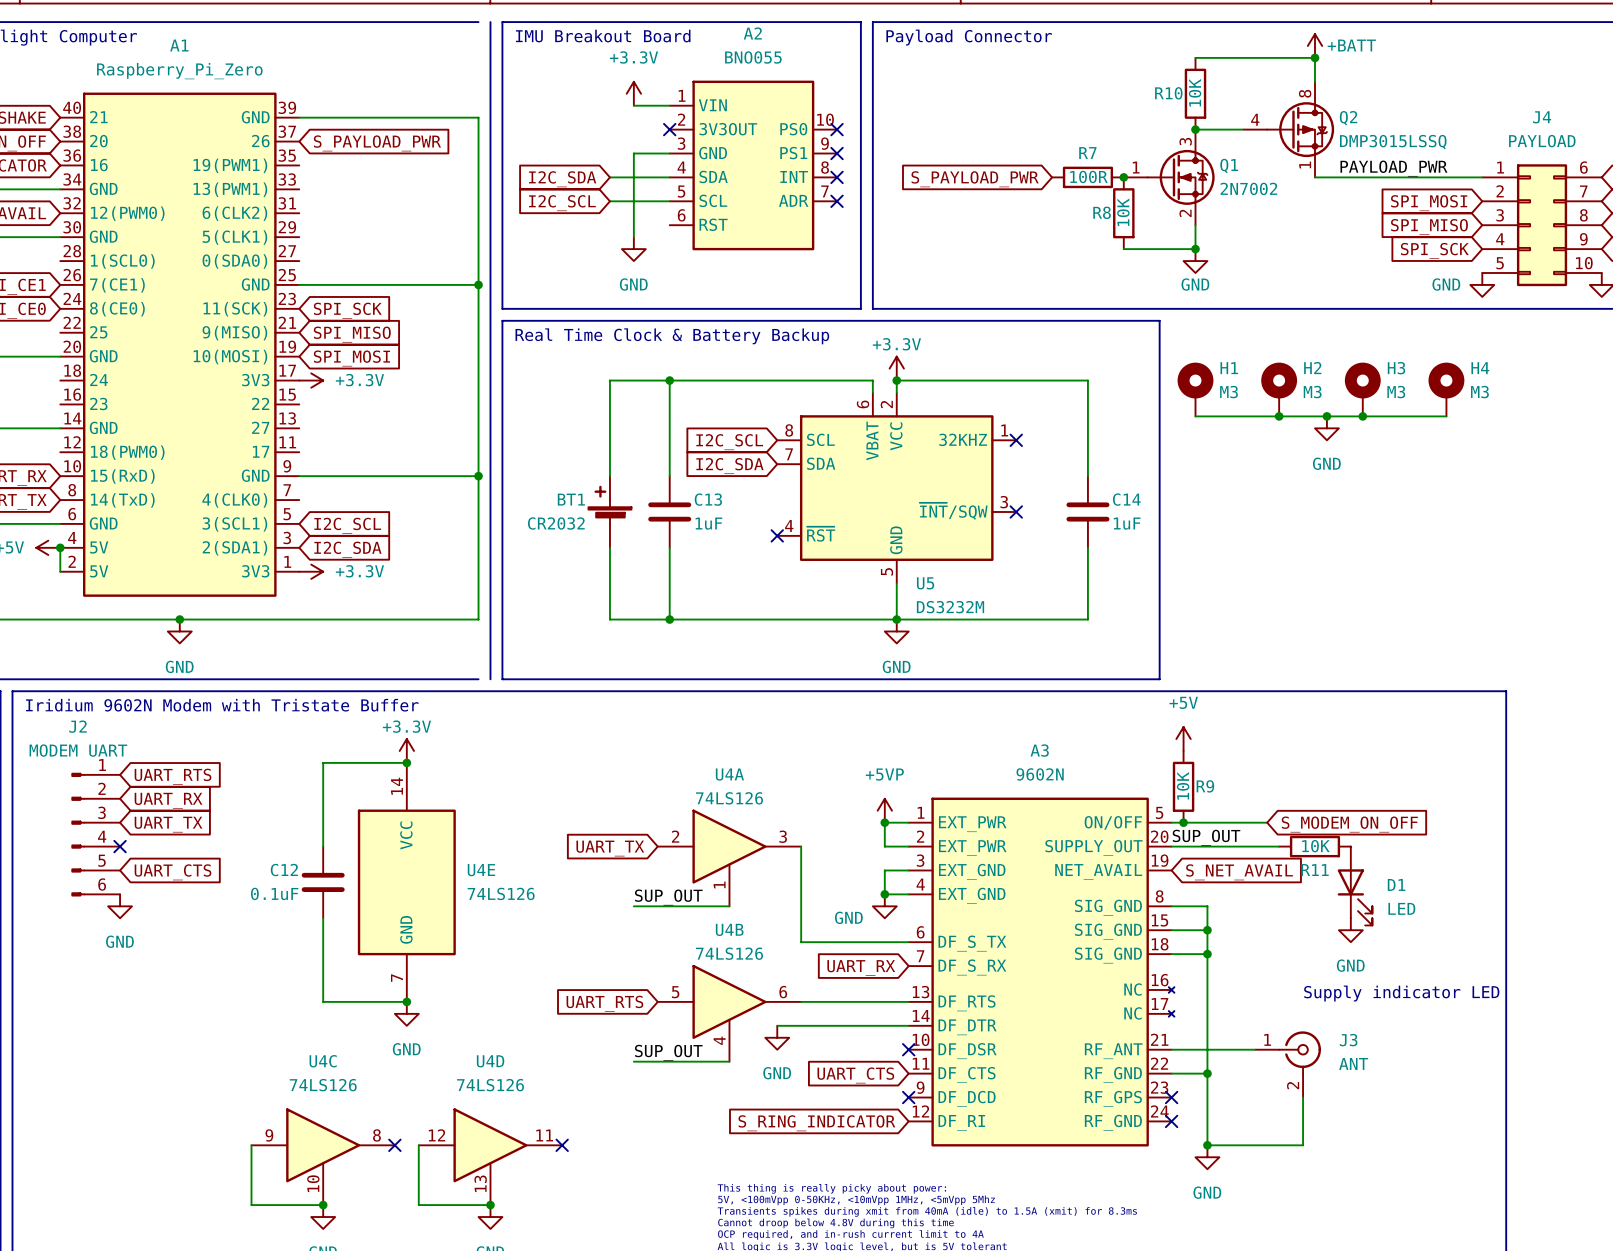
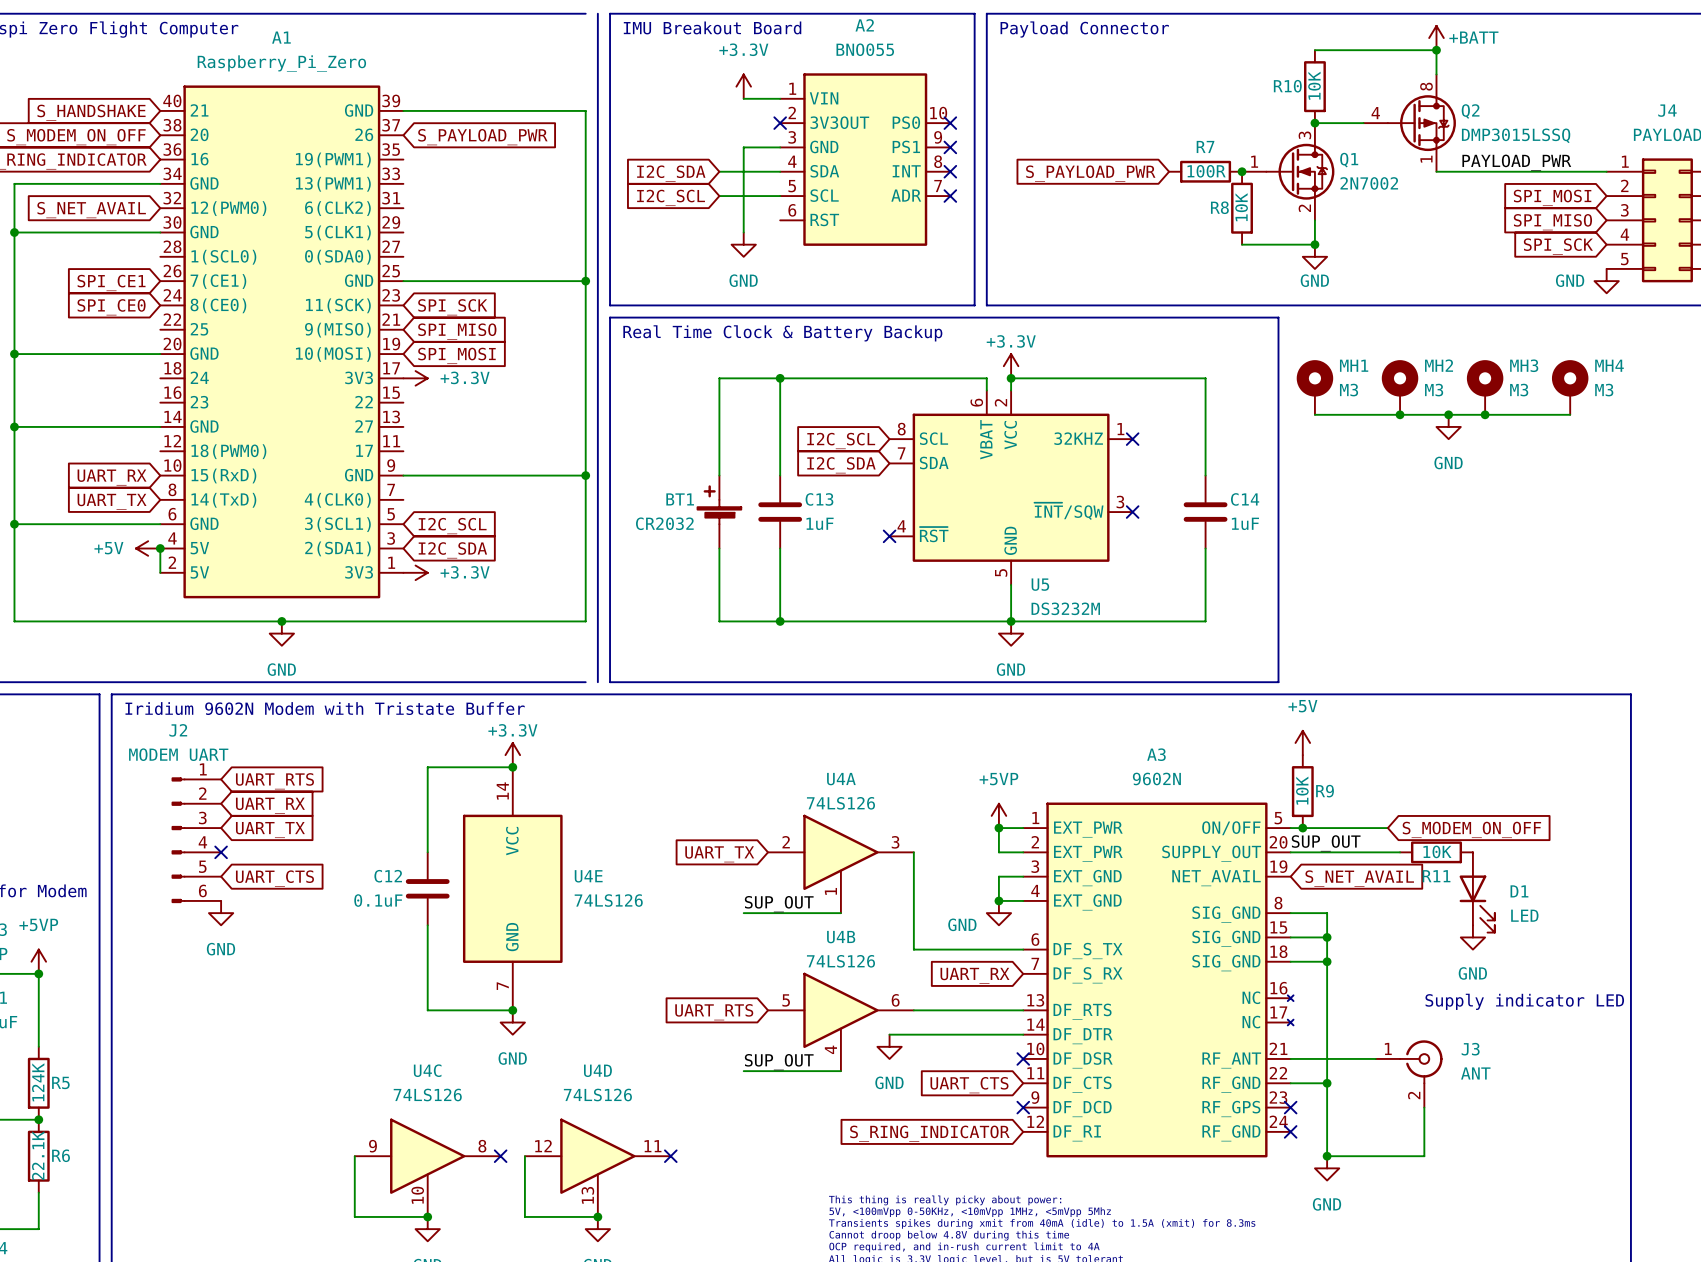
H1 name: H1 (1229, 368) -> MH1 (1354, 365)
H2 name: H2 (1312, 368) -> MH2 (1439, 365)
H3 name: H3 (1396, 368) -> MH3 (1524, 365)
H4 name: H4 (1480, 368) -> MH4 (1609, 365)

